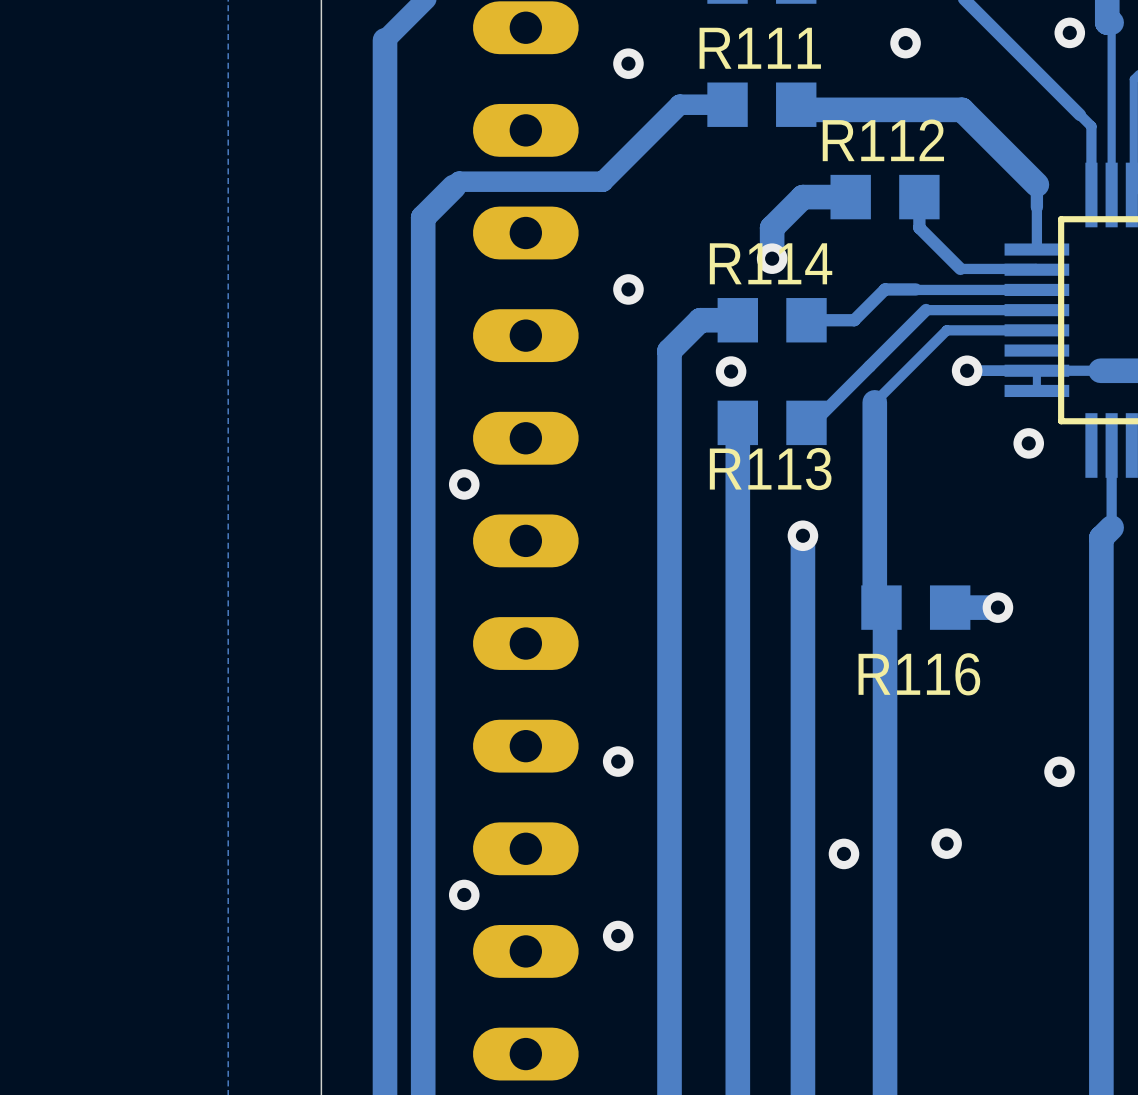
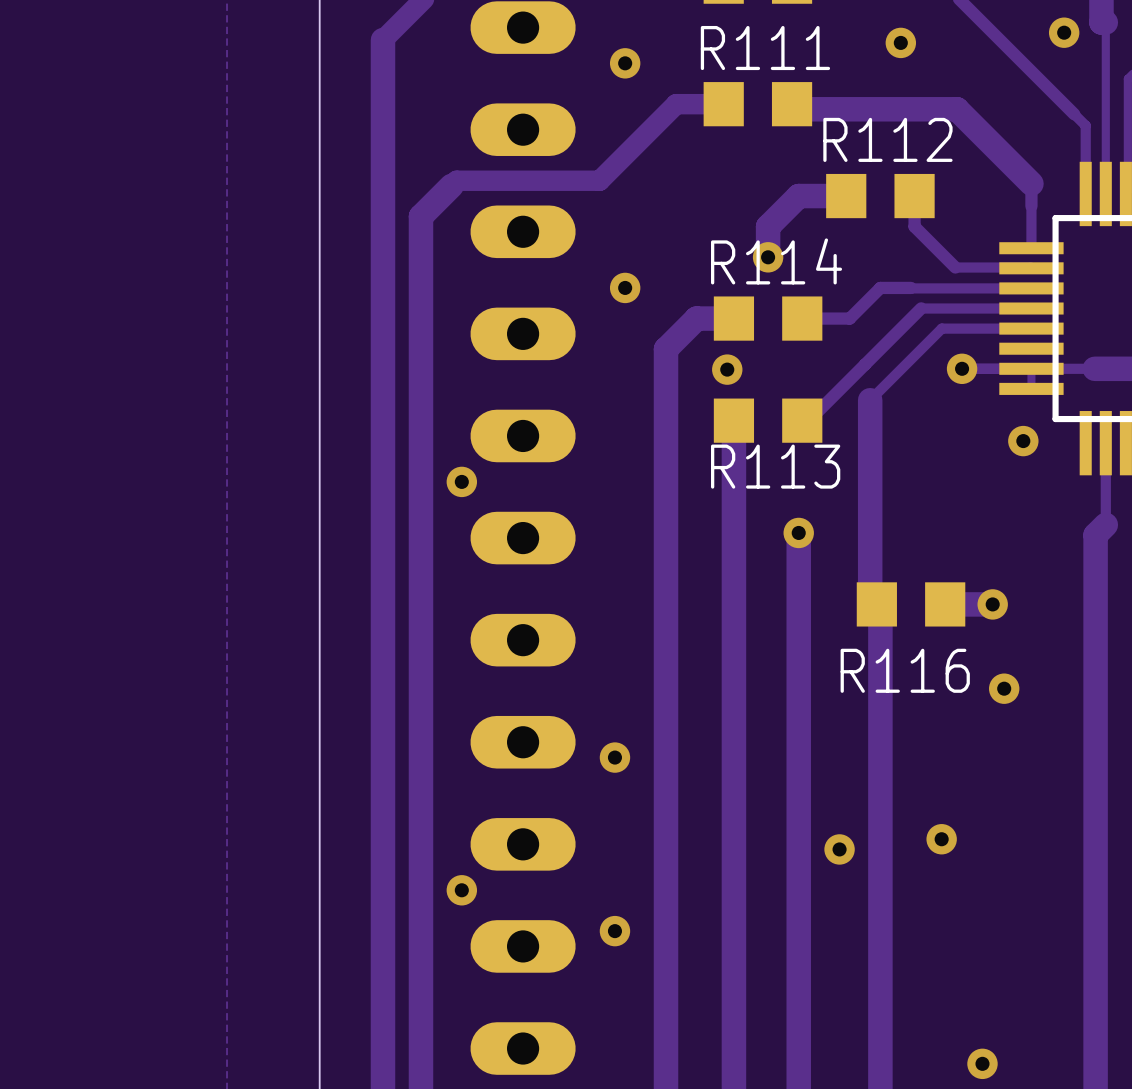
via position: (1059, 771) -> (1004, 688)
via: none -> (982, 1063)

